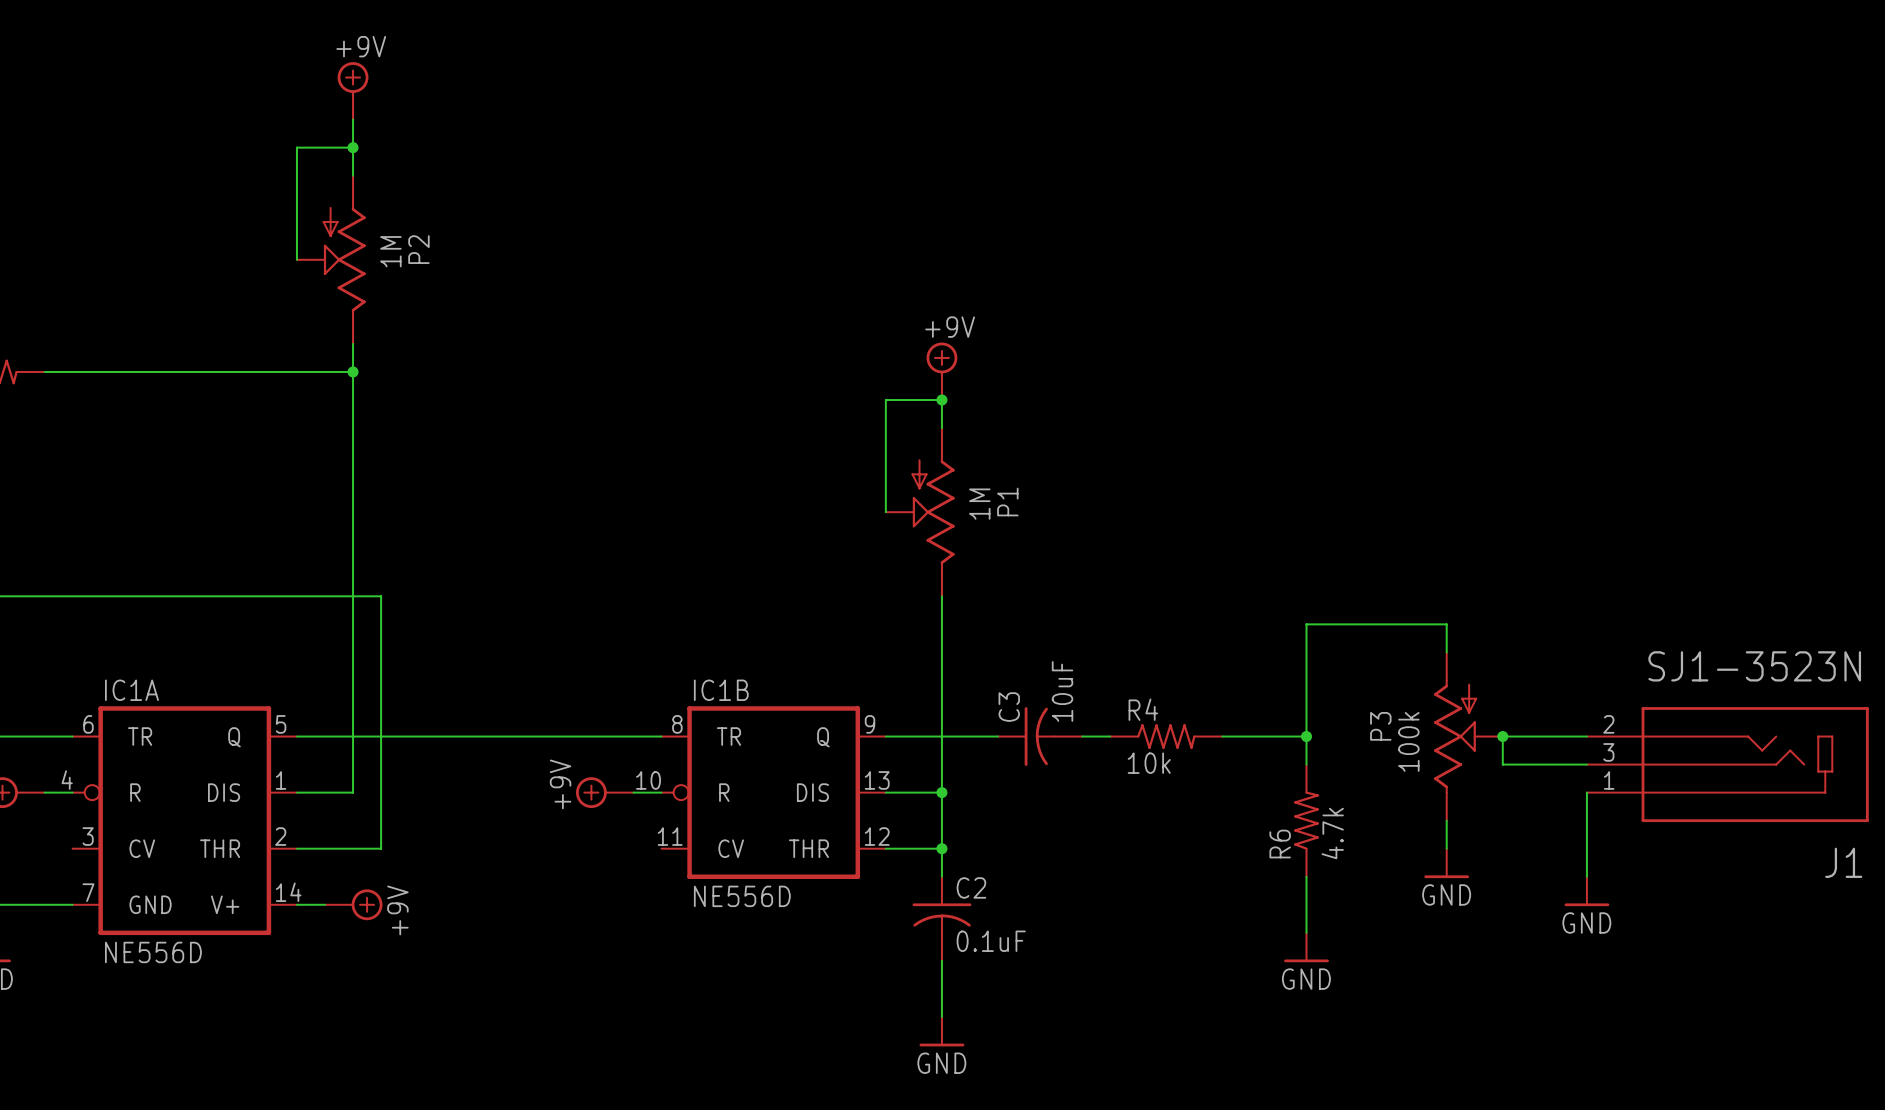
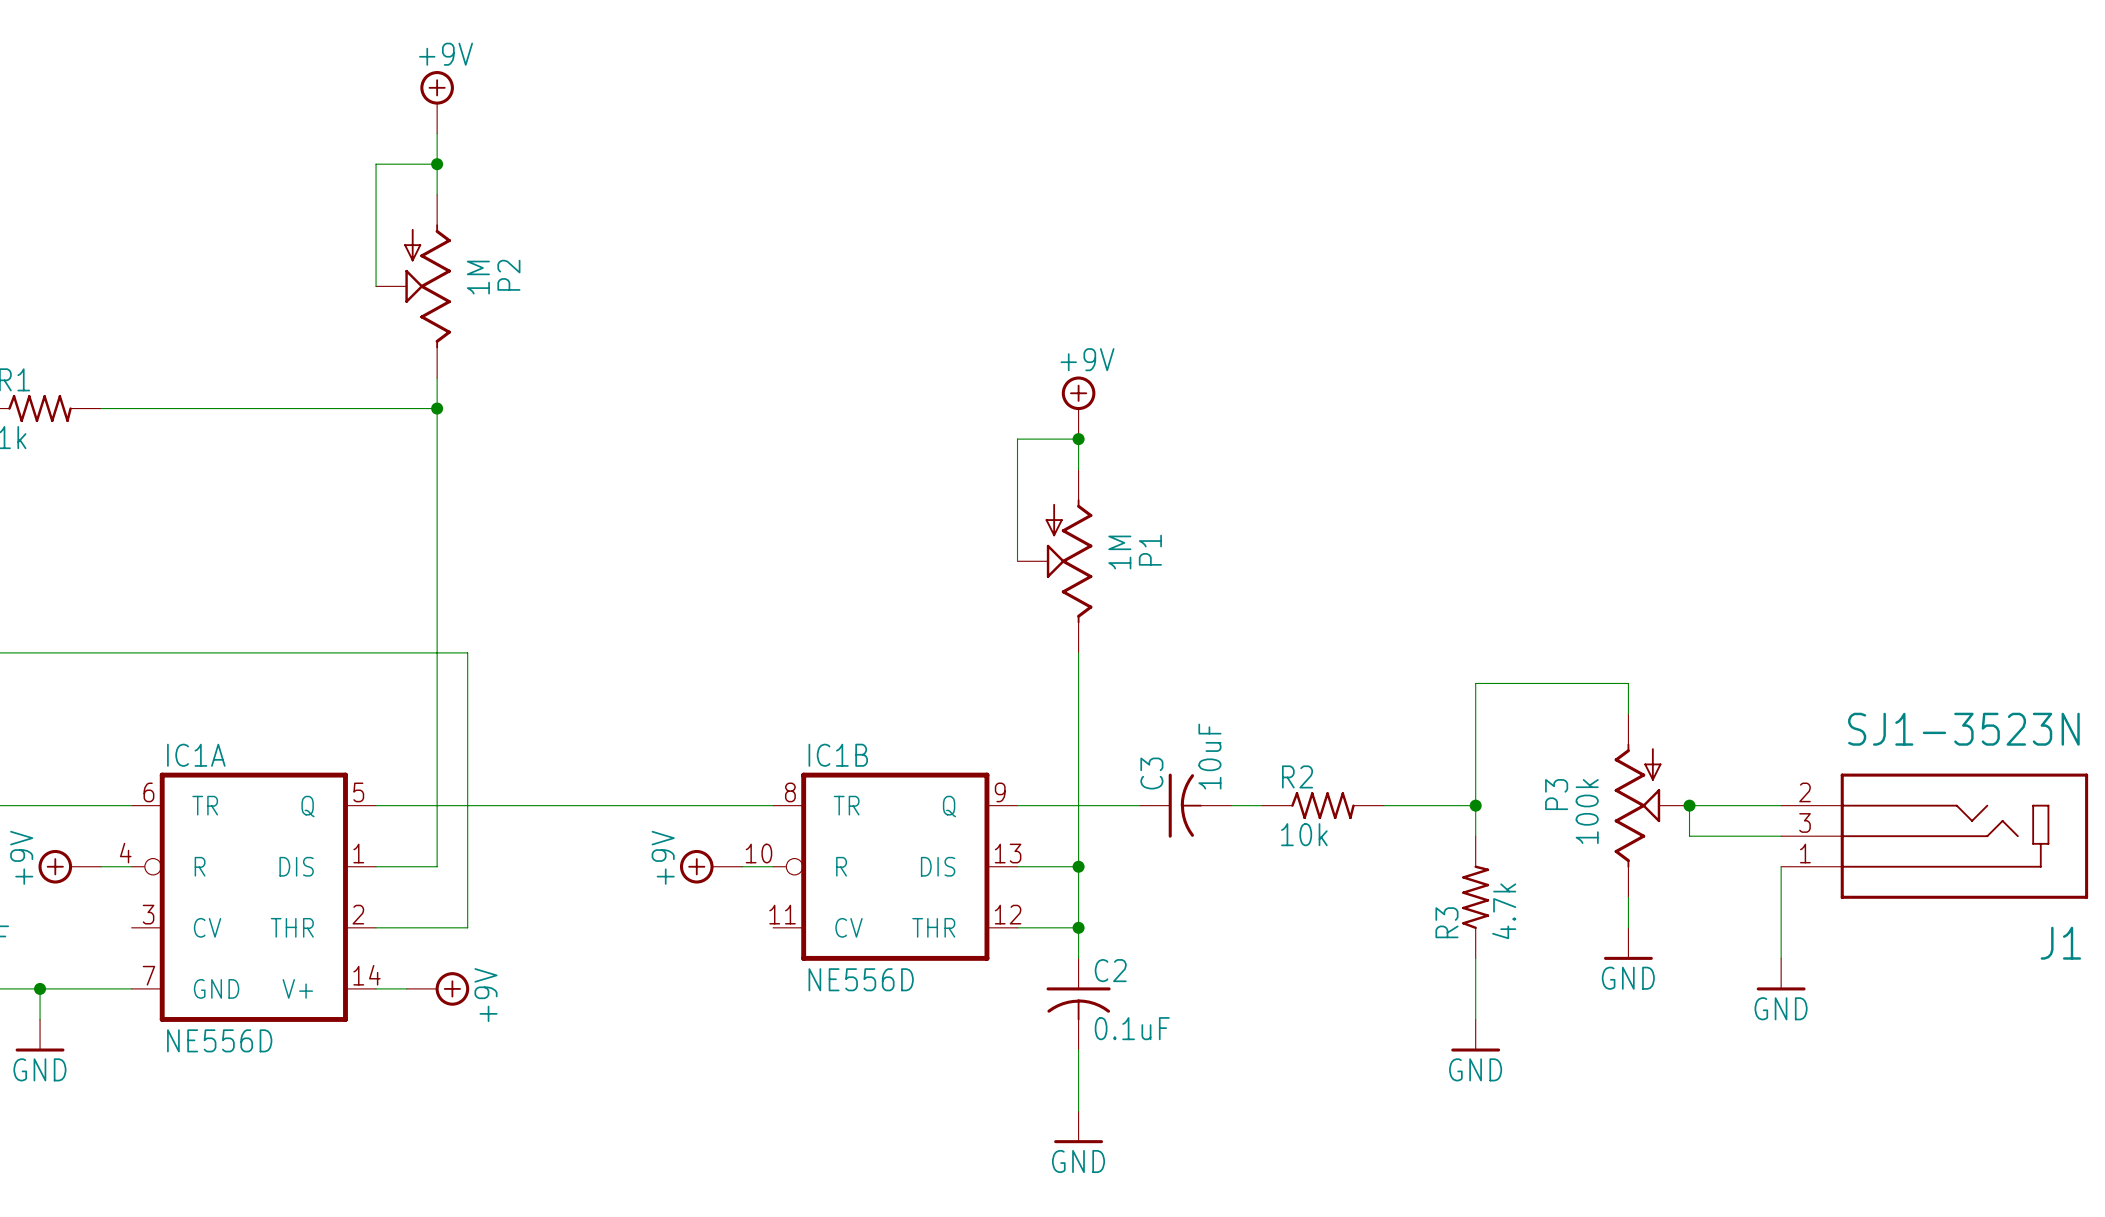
R4 name: R4 (1143, 709) -> R2 (1297, 776)
R6 name: R6 (1280, 844) -> R3 (1446, 922)

